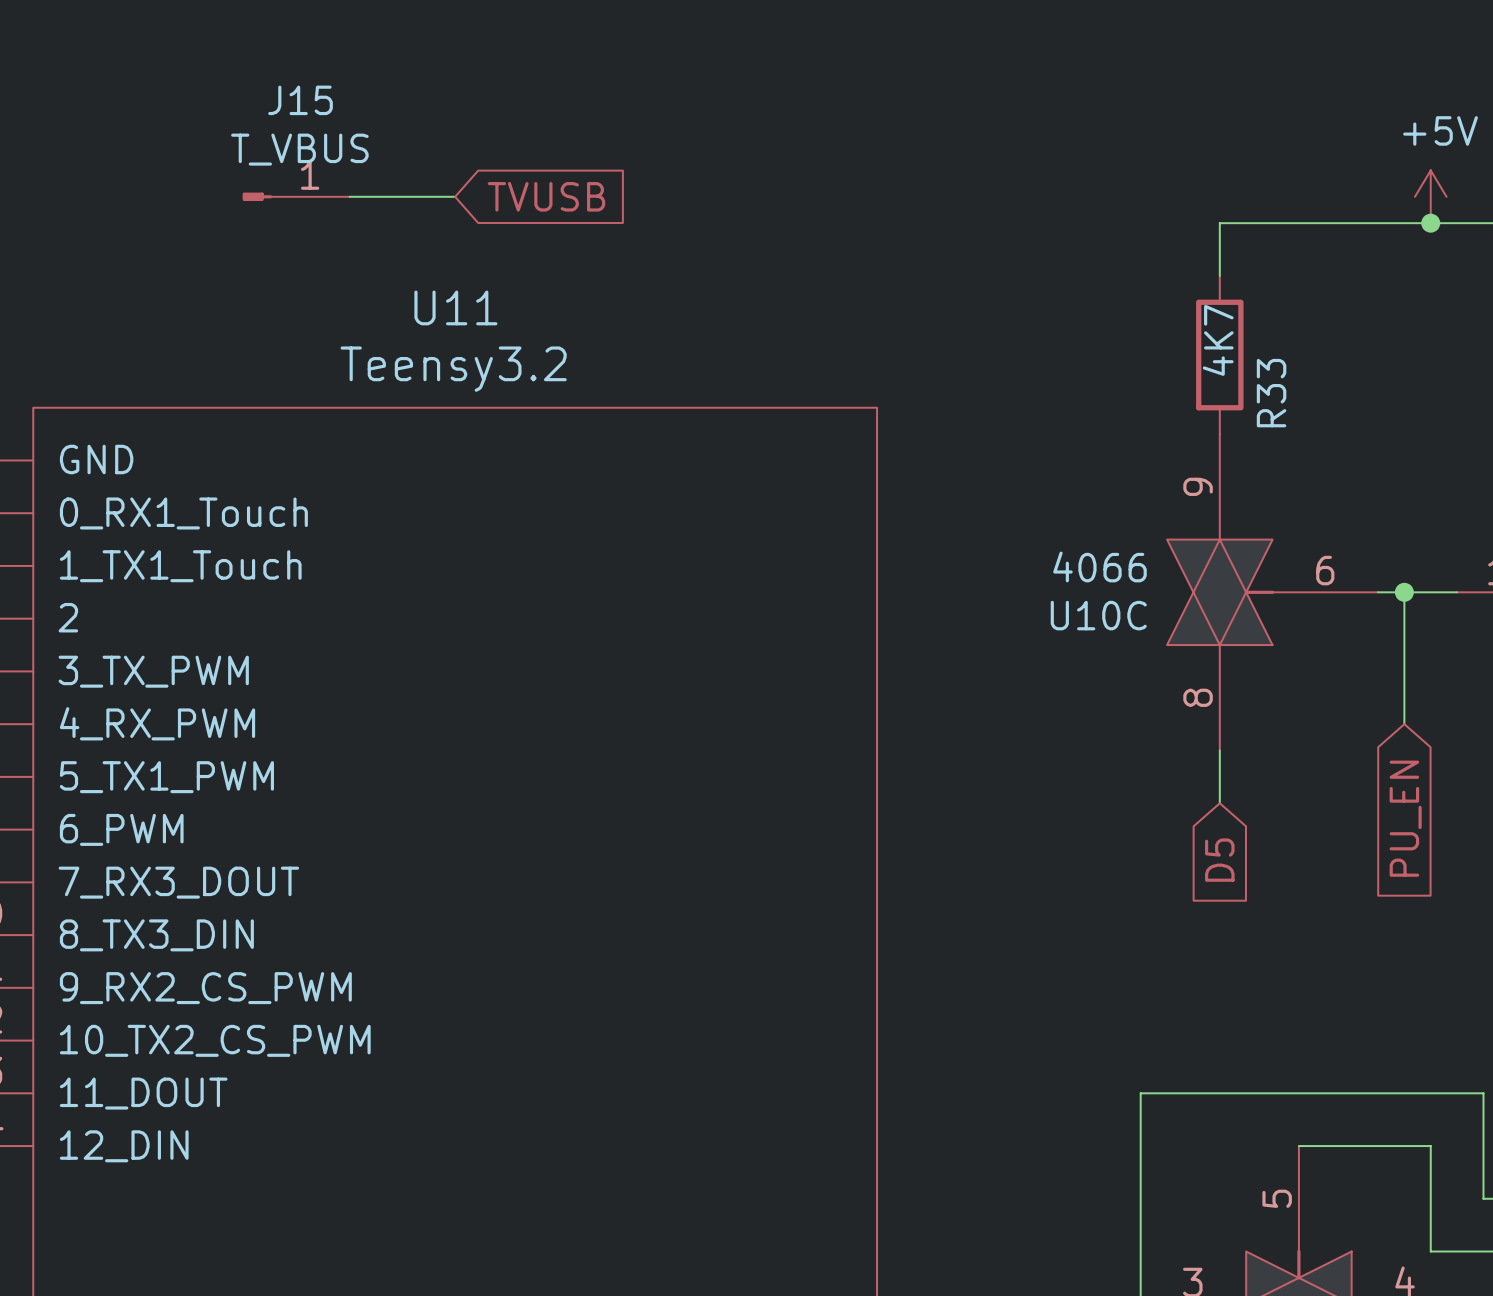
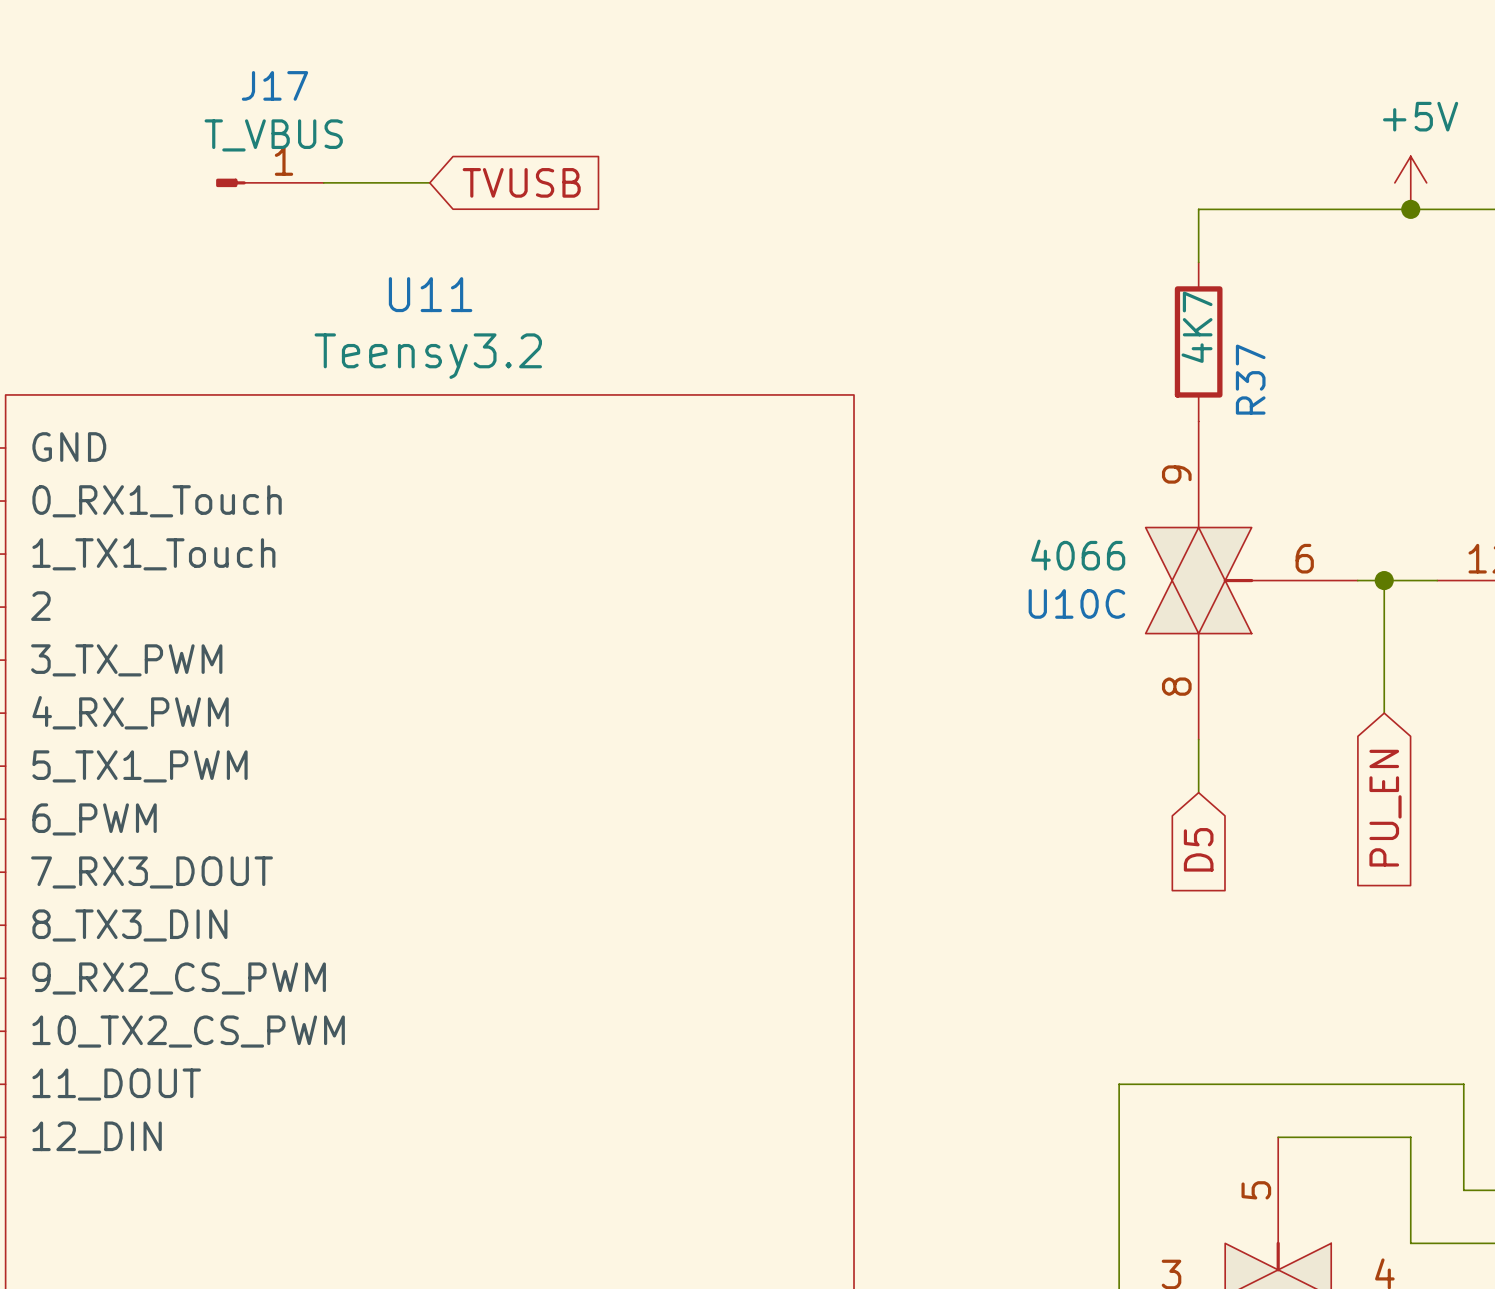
J15 name: J15 (300, 100) -> J17 (274, 85)
R33 name: R33 (1271, 393) -> R37 (1250, 379)

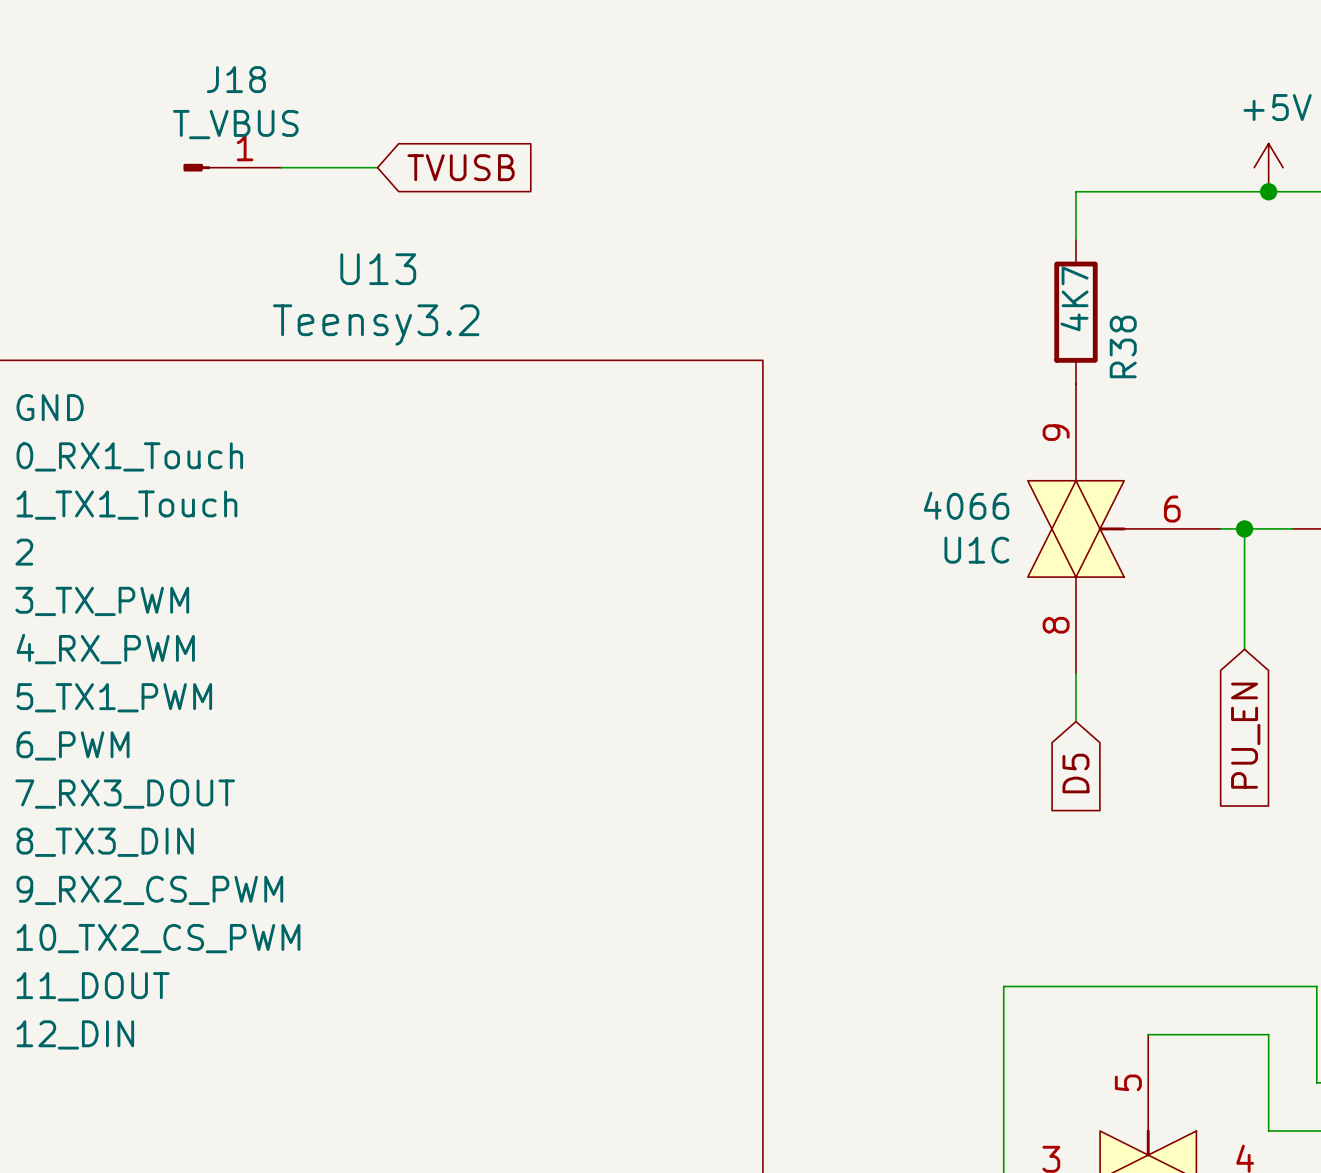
J17 name: J17 (274, 85) -> J18 (236, 79)
U11 name: U11 (430, 294) -> U13 (378, 269)
R37 name: R37 (1250, 379) -> R38 (1123, 346)
U10C name: U10C (1076, 603) -> U1C (976, 550)

